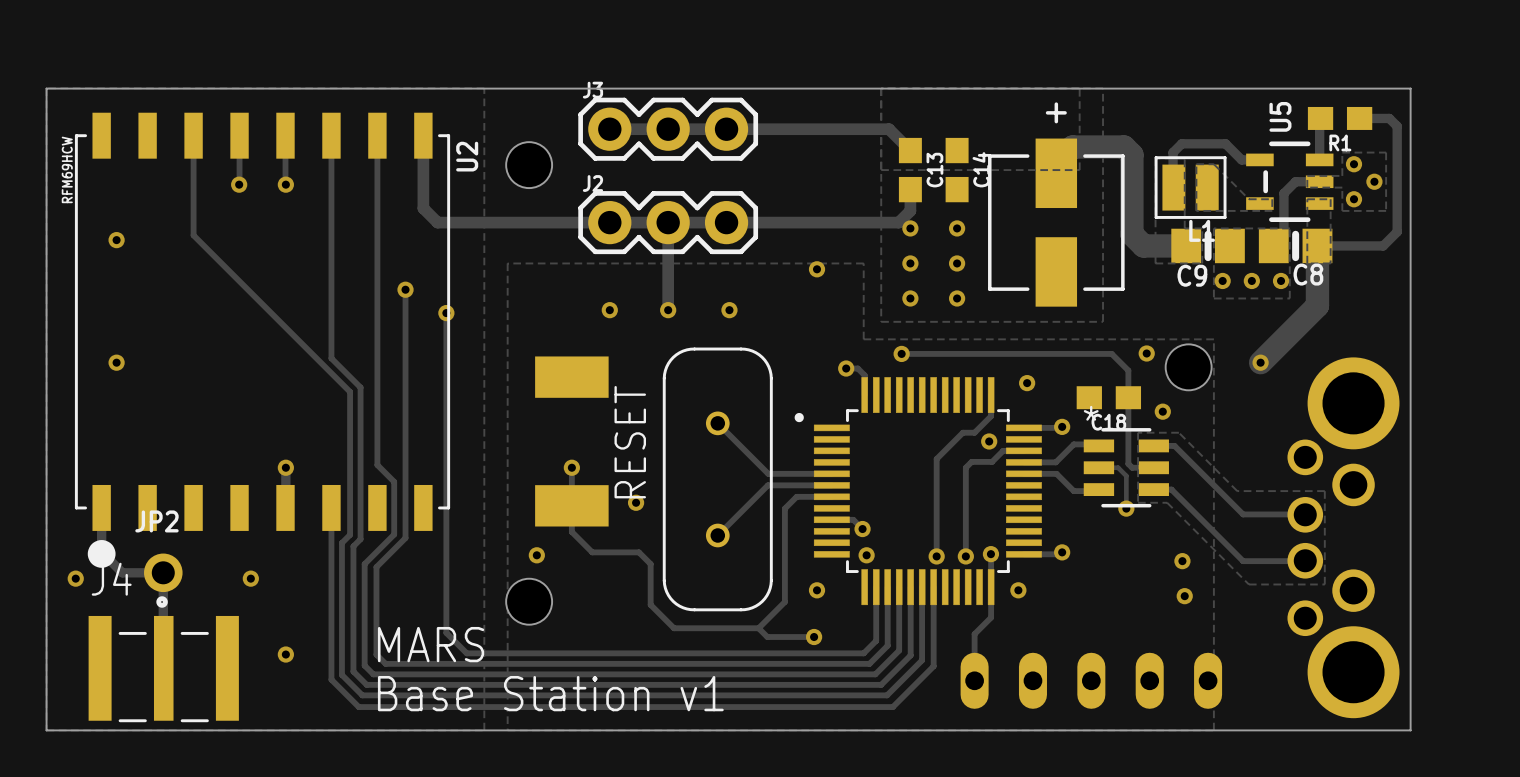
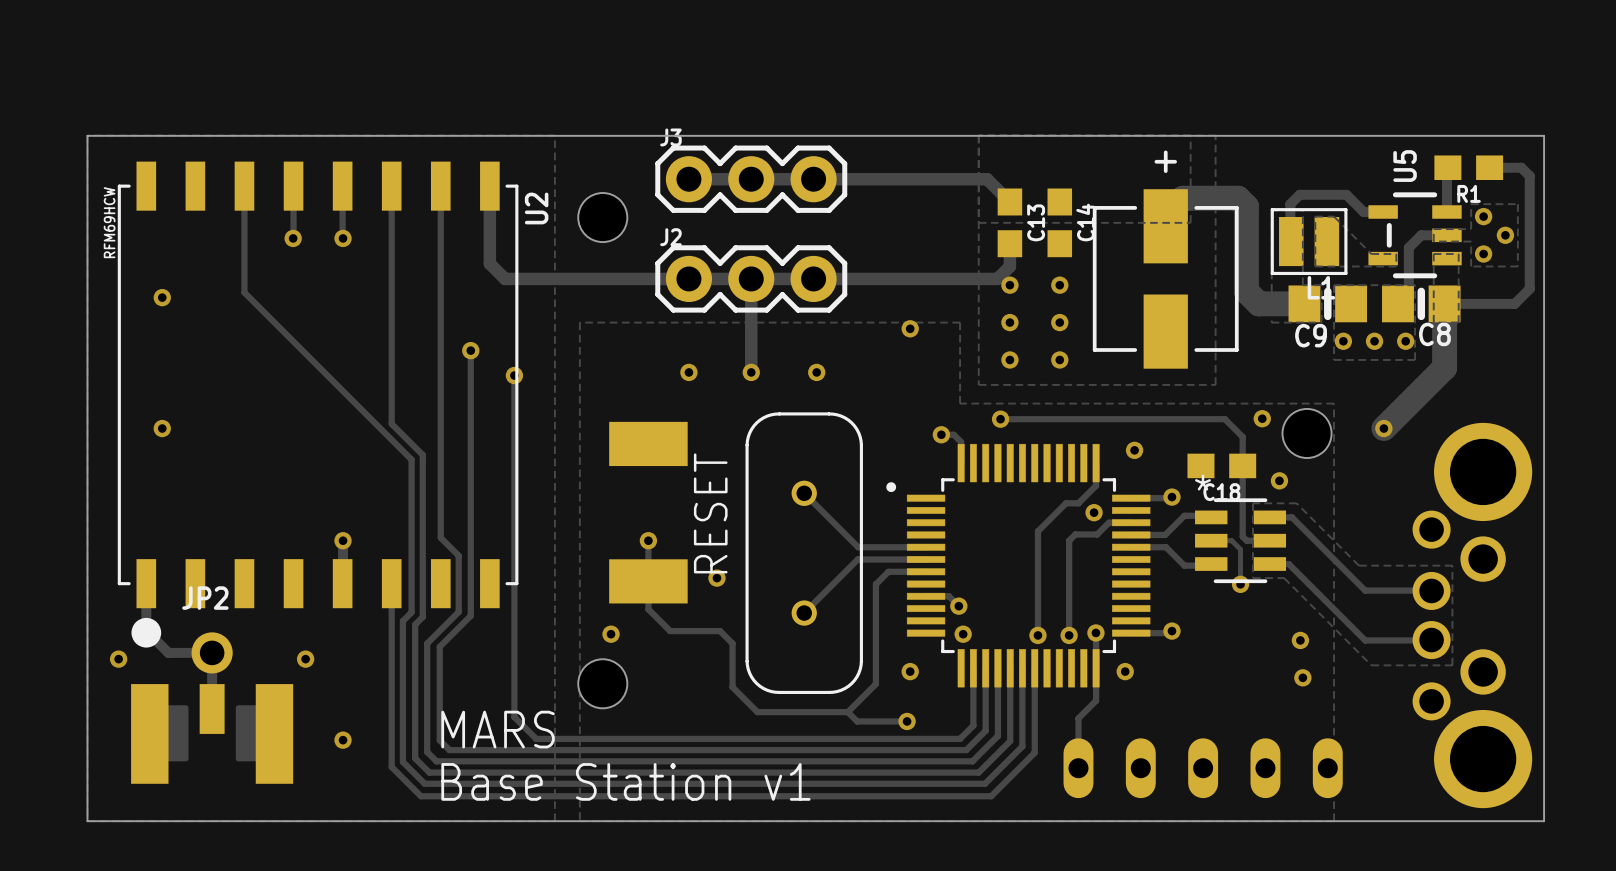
part: none -> (212, 733)
J4: (163, 659) -> none

